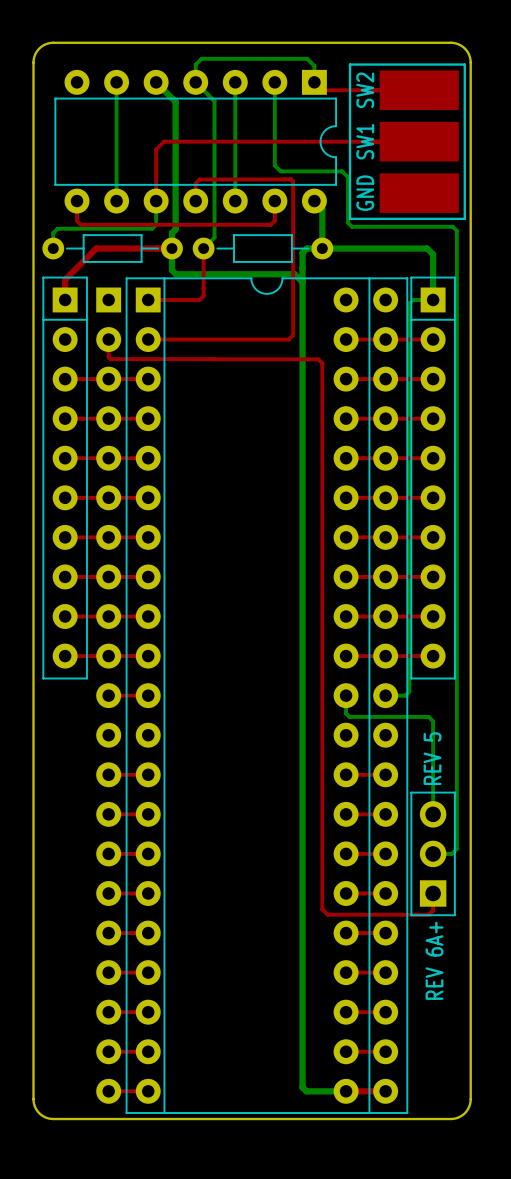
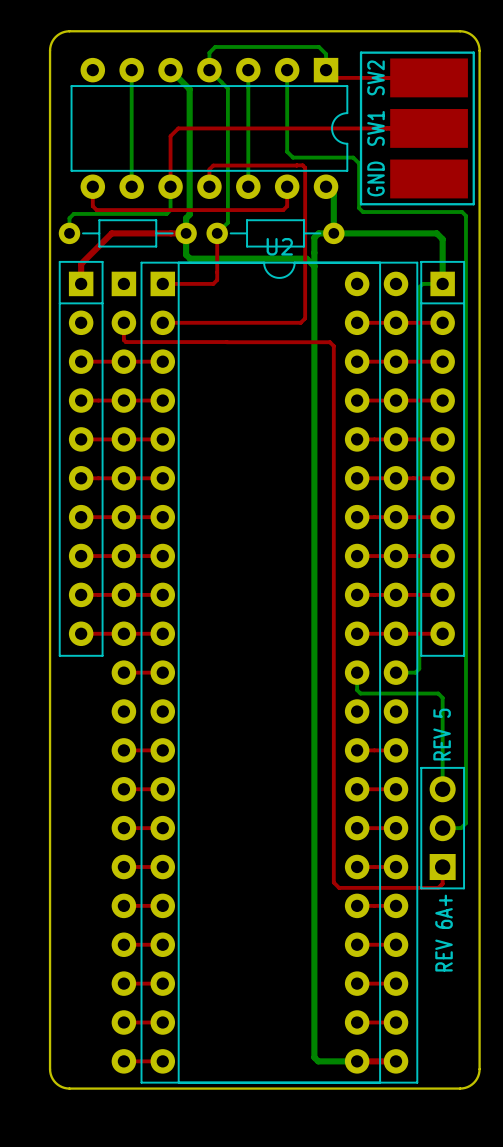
part: (266, 695) -> none
U2: none -> (279, 672)

